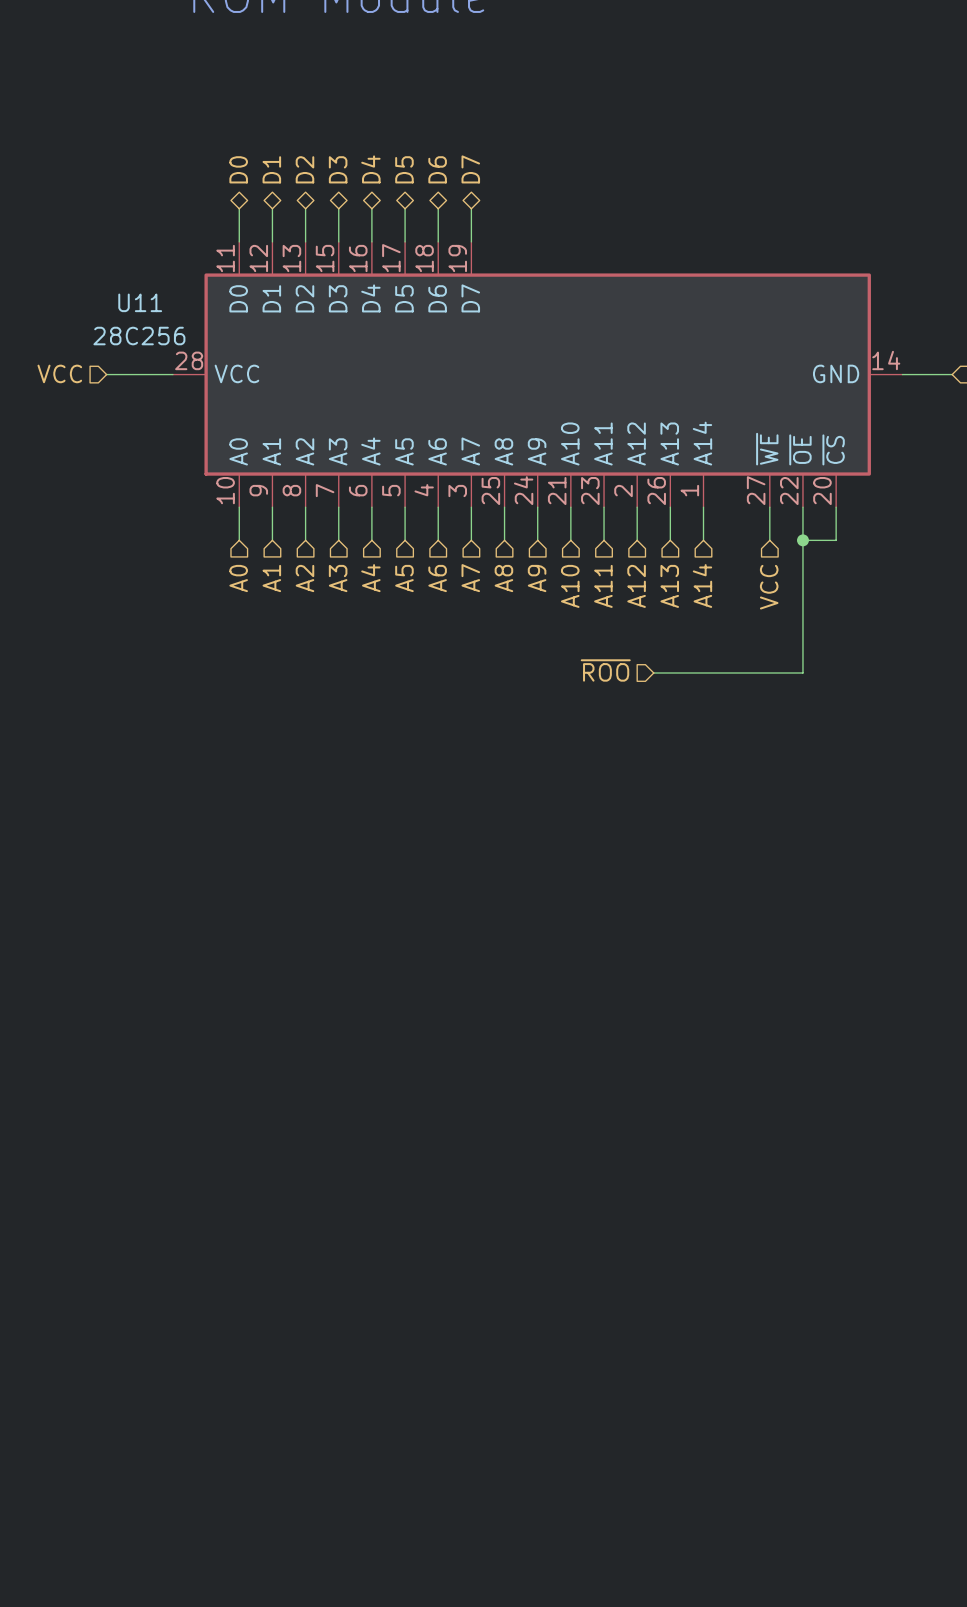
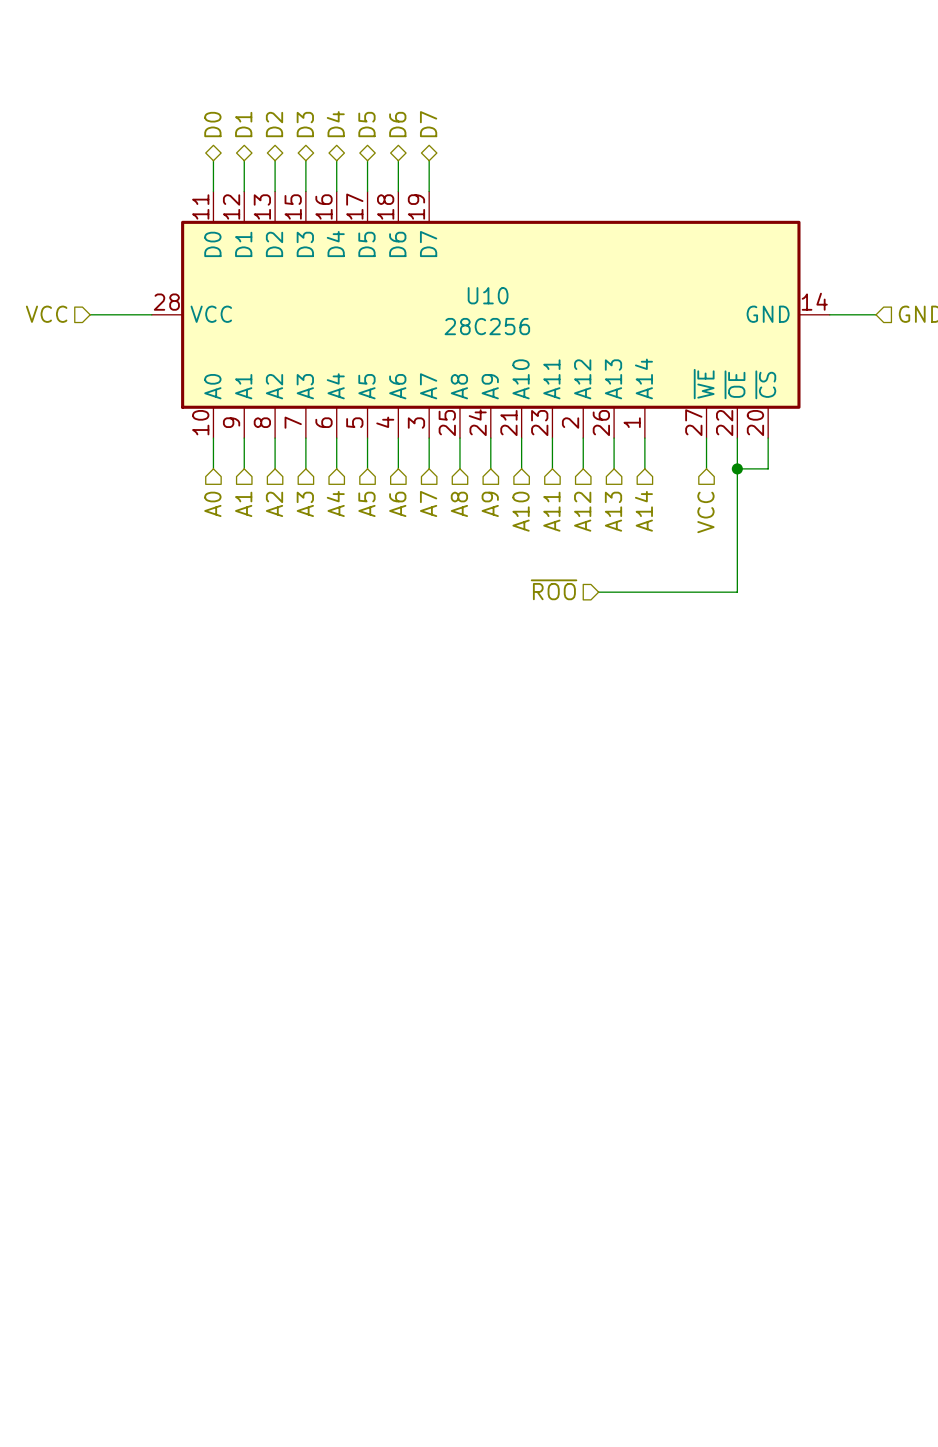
U11 name: U11 (140, 302) -> U10 (488, 295)
U11 value position: 28C256 (139, 336) -> 28C256 (487, 326)

